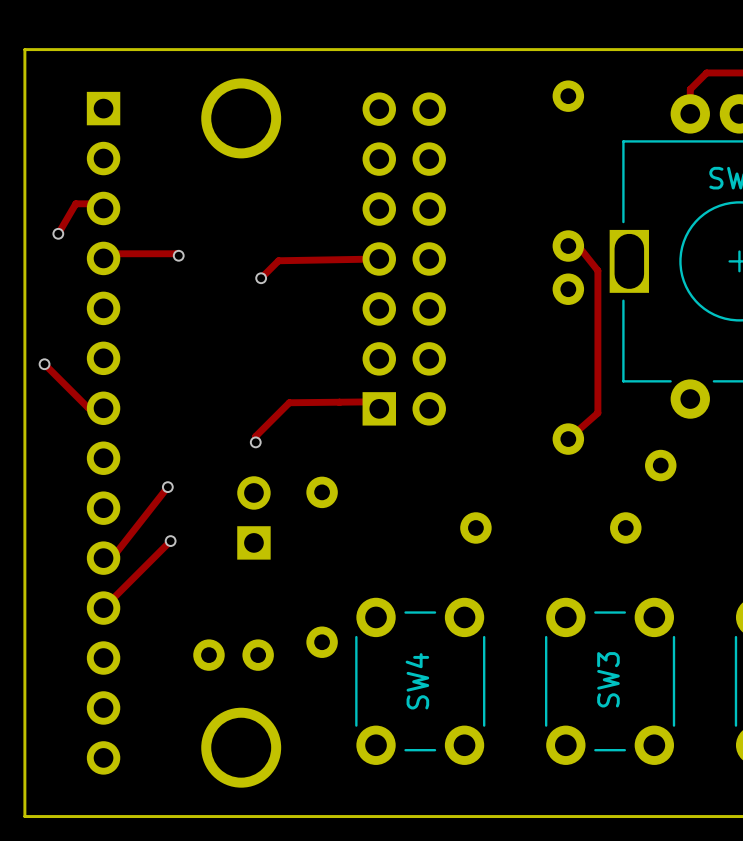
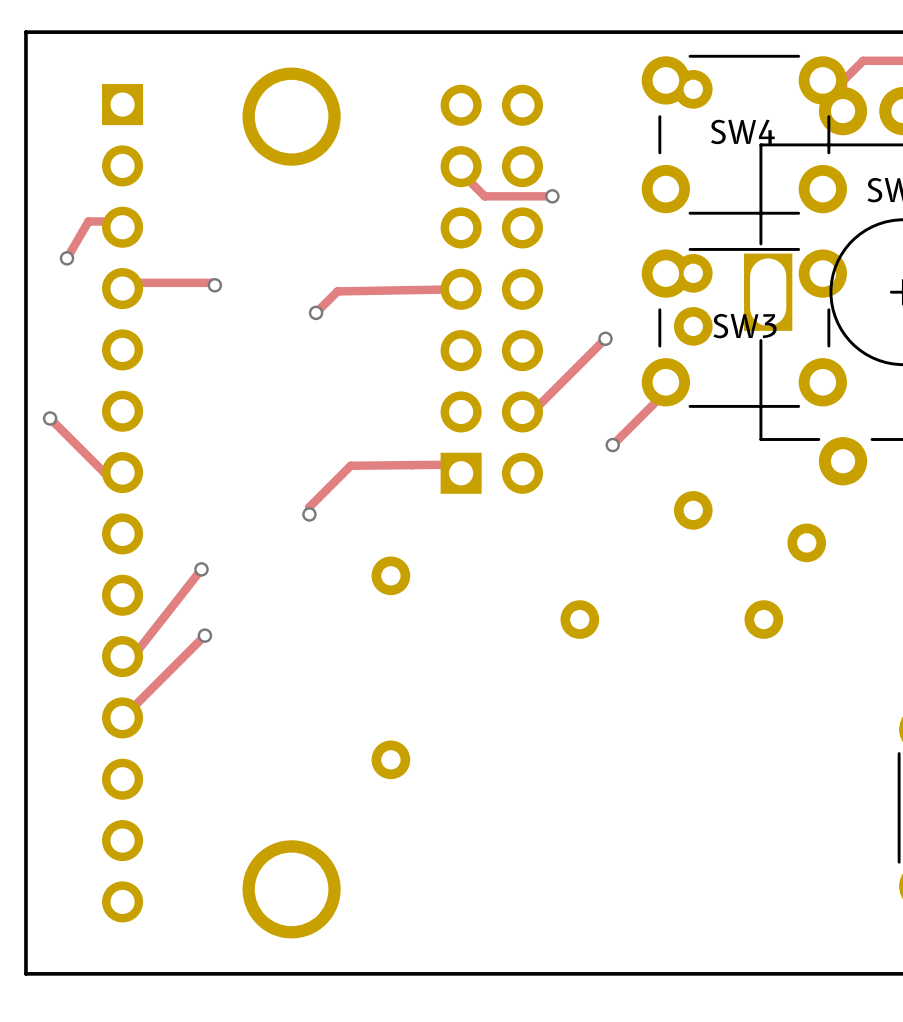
track: none -> (461, 166) (461, 172) (484, 196) (552, 196)
via: none -> (552, 196)
track: (568, 246) (578, 246) (597, 270) (597, 413) (568, 439) -> none
track: none -> (605, 338) (532, 411) (522, 411)
via: none -> (605, 338)
track: none -> (665, 382) (665, 391) (612, 445)
via: none -> (612, 445)
part: (253, 517) -> none
part: (233, 655) -> none
SW4 rotation: 0° (420, 681) -> 90° clockwise (744, 134)
SW4 position: (420, 681) -> (744, 134)
SW3 rotation: 0° (610, 681) -> 90° clockwise (744, 327)
SW3 position: (610, 681) -> (744, 327)

